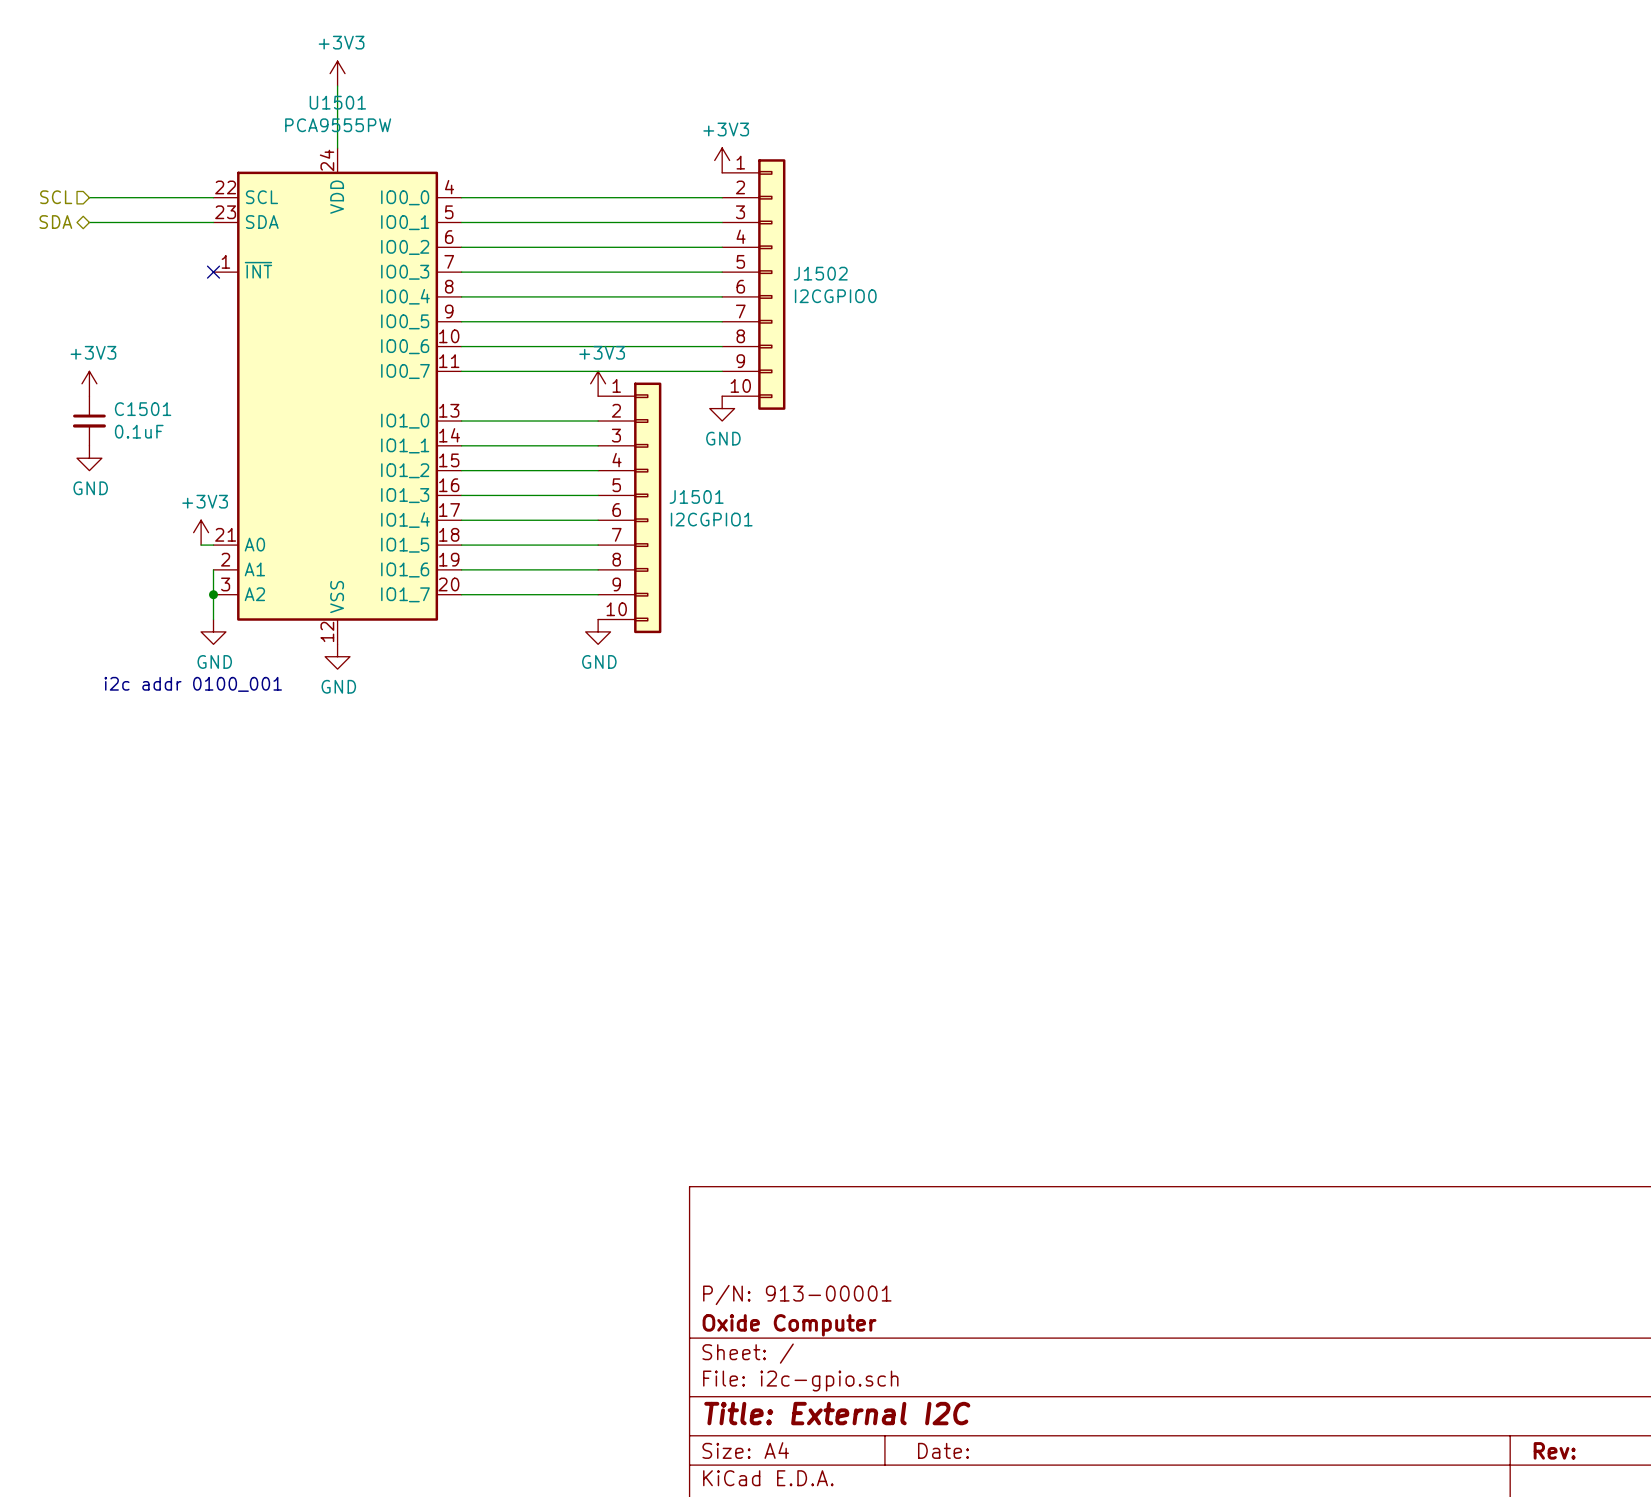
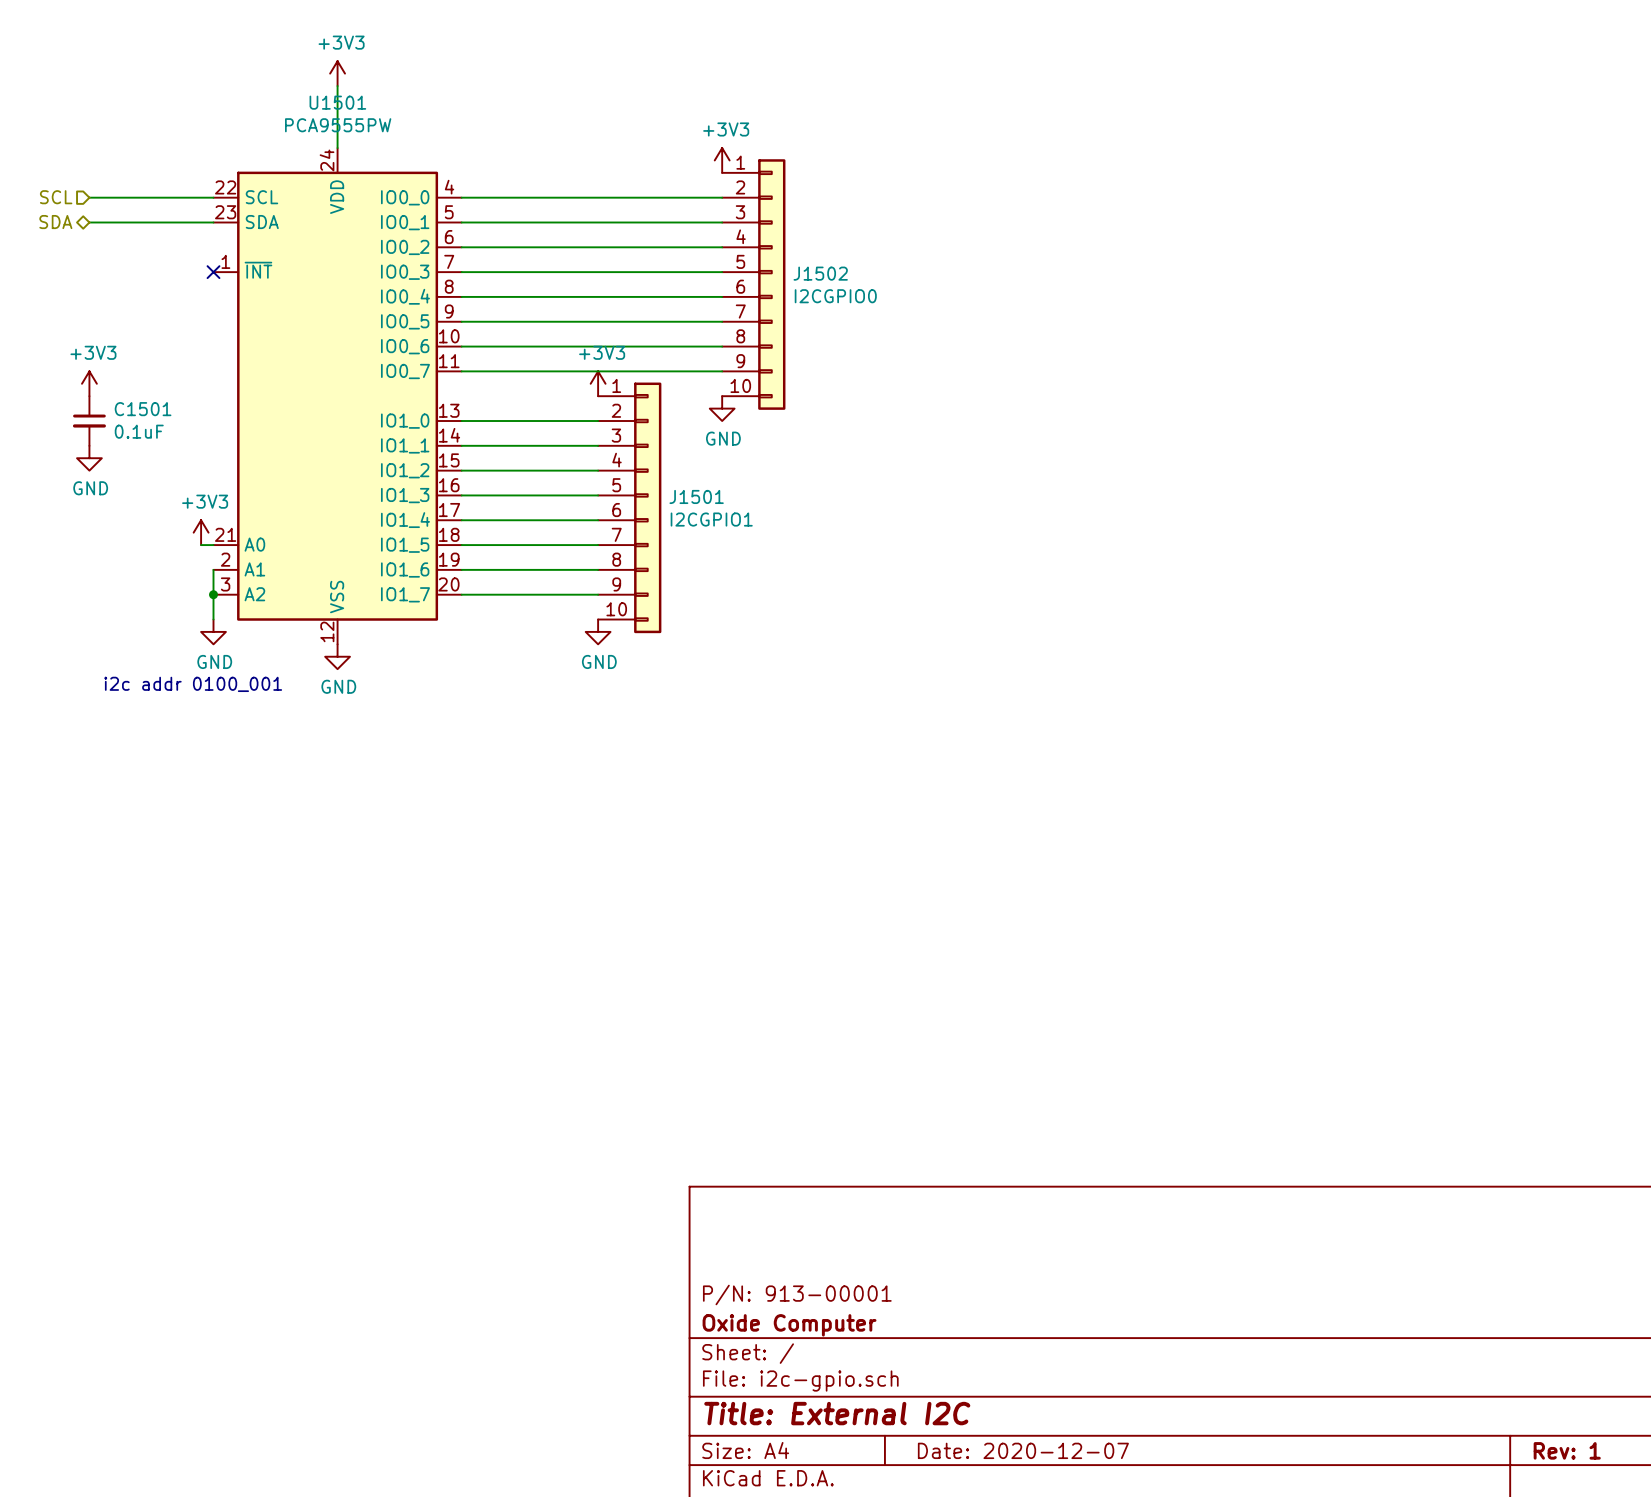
title block: Date: (943, 1450) -> Date: 2020-12-07 (1023, 1450)
title block: Rev: (1554, 1450) -> Rev: 1 (1567, 1450)

